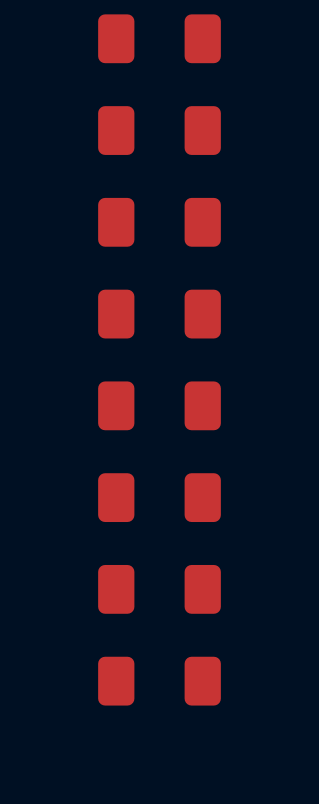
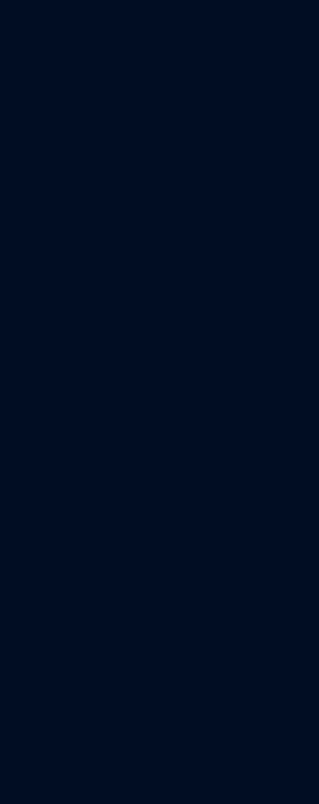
part: (159, 38) -> none
part: (159, 130) -> none
part: (159, 222) -> none
part: (159, 314) -> none
part: (159, 405) -> none
part: (159, 497) -> none
part: (159, 589) -> none
part: (159, 681) -> none

